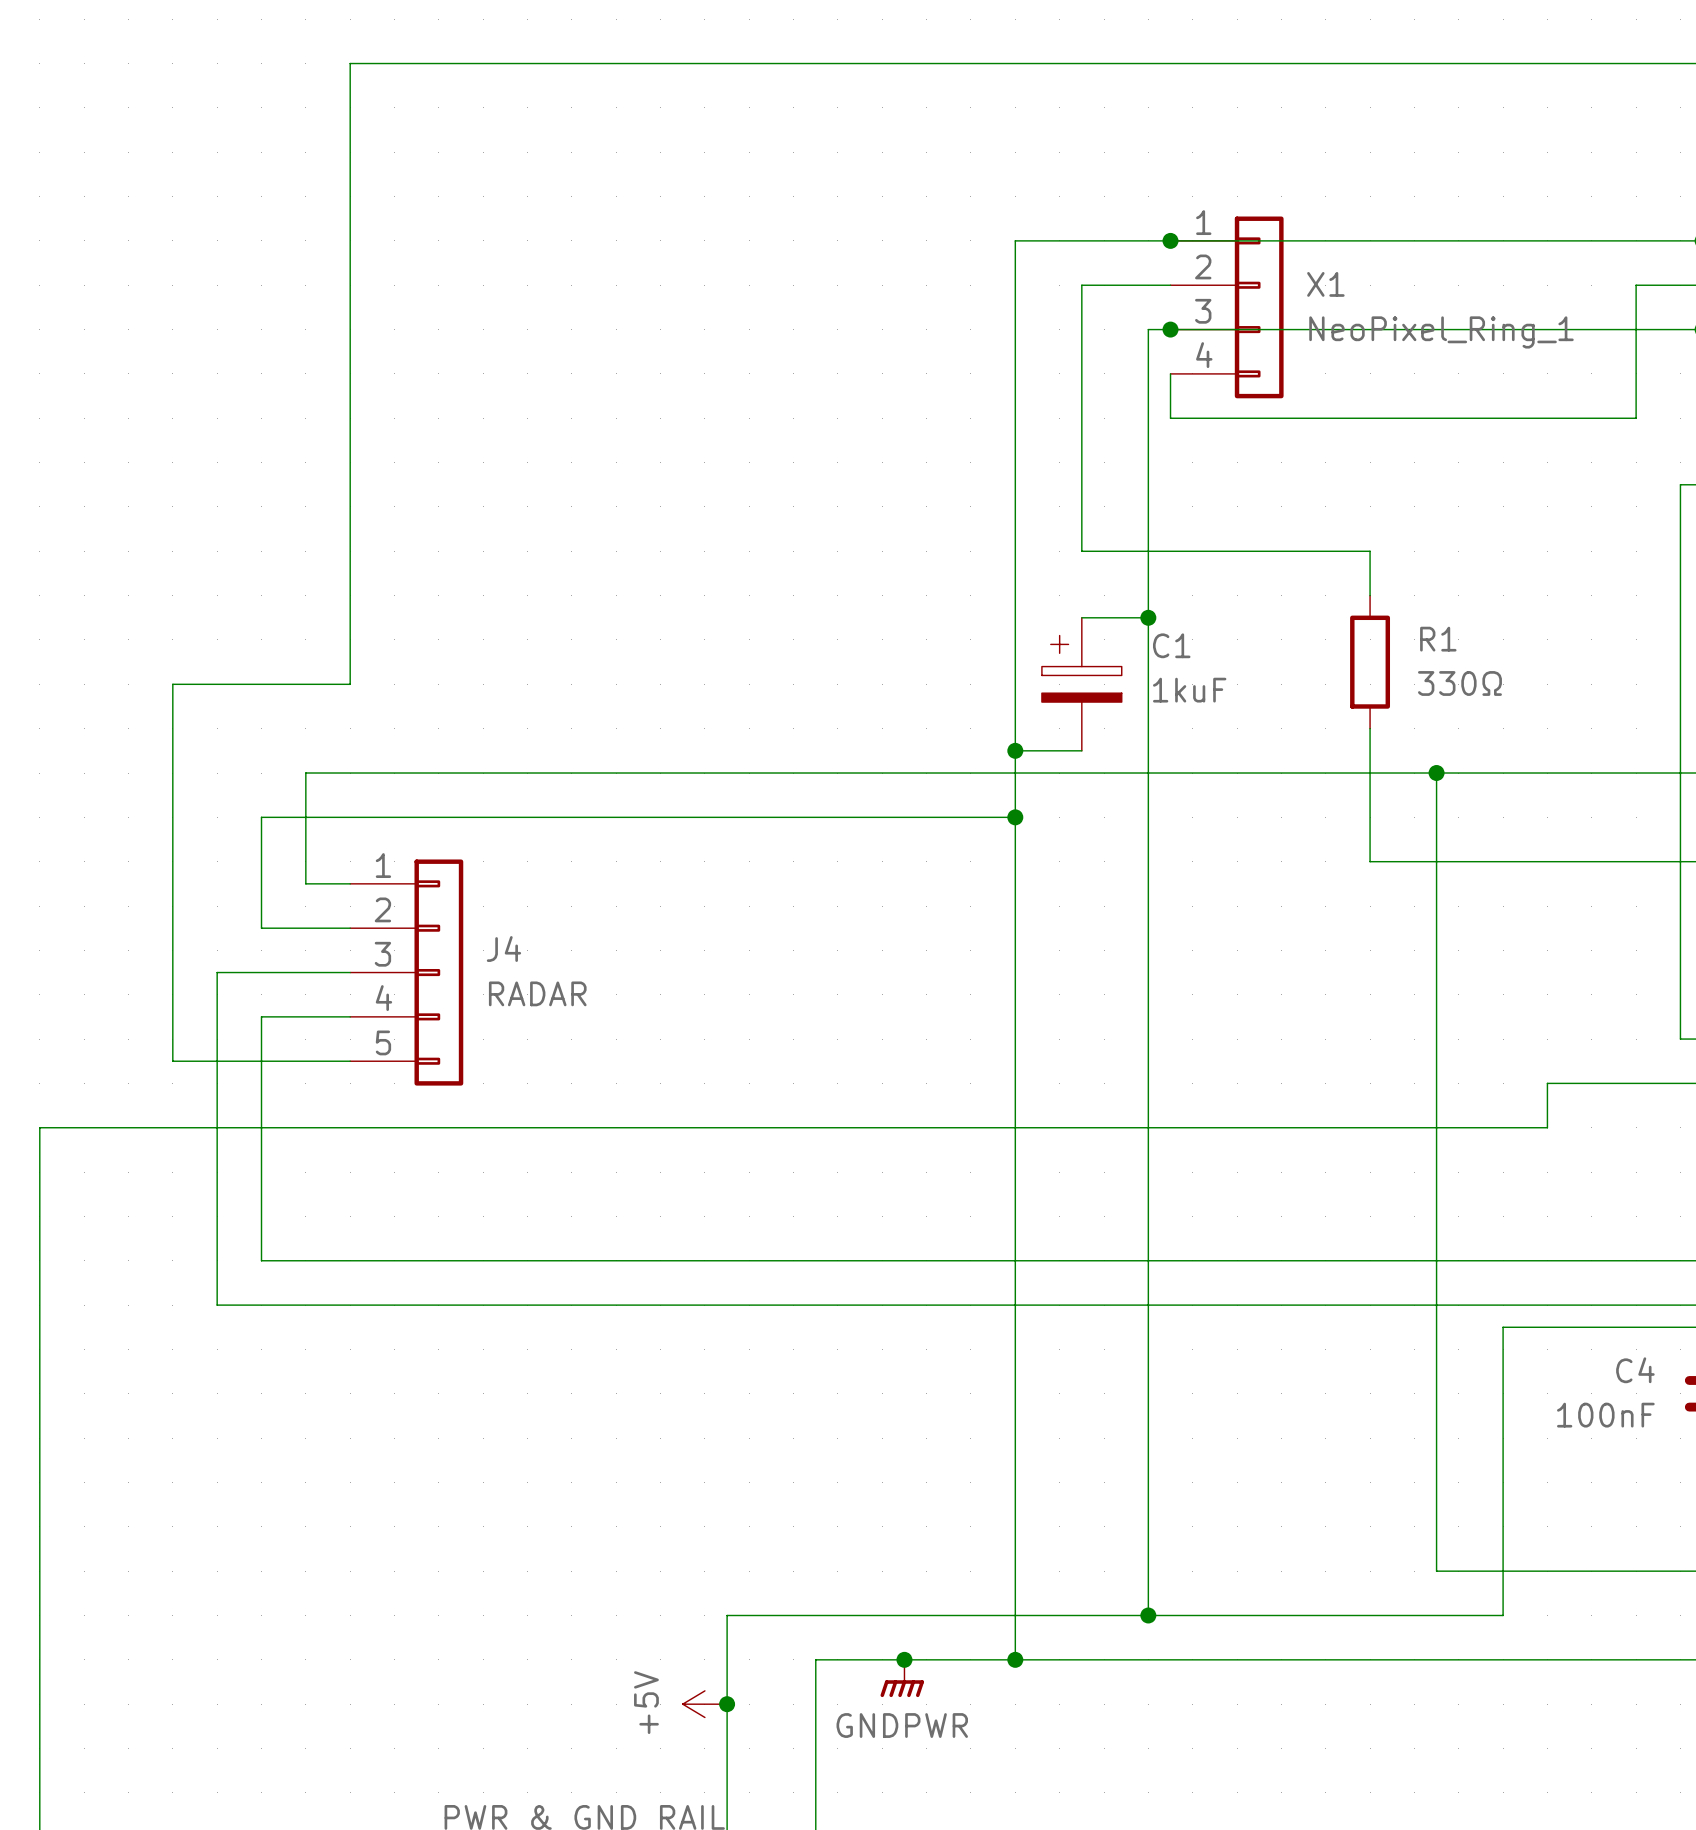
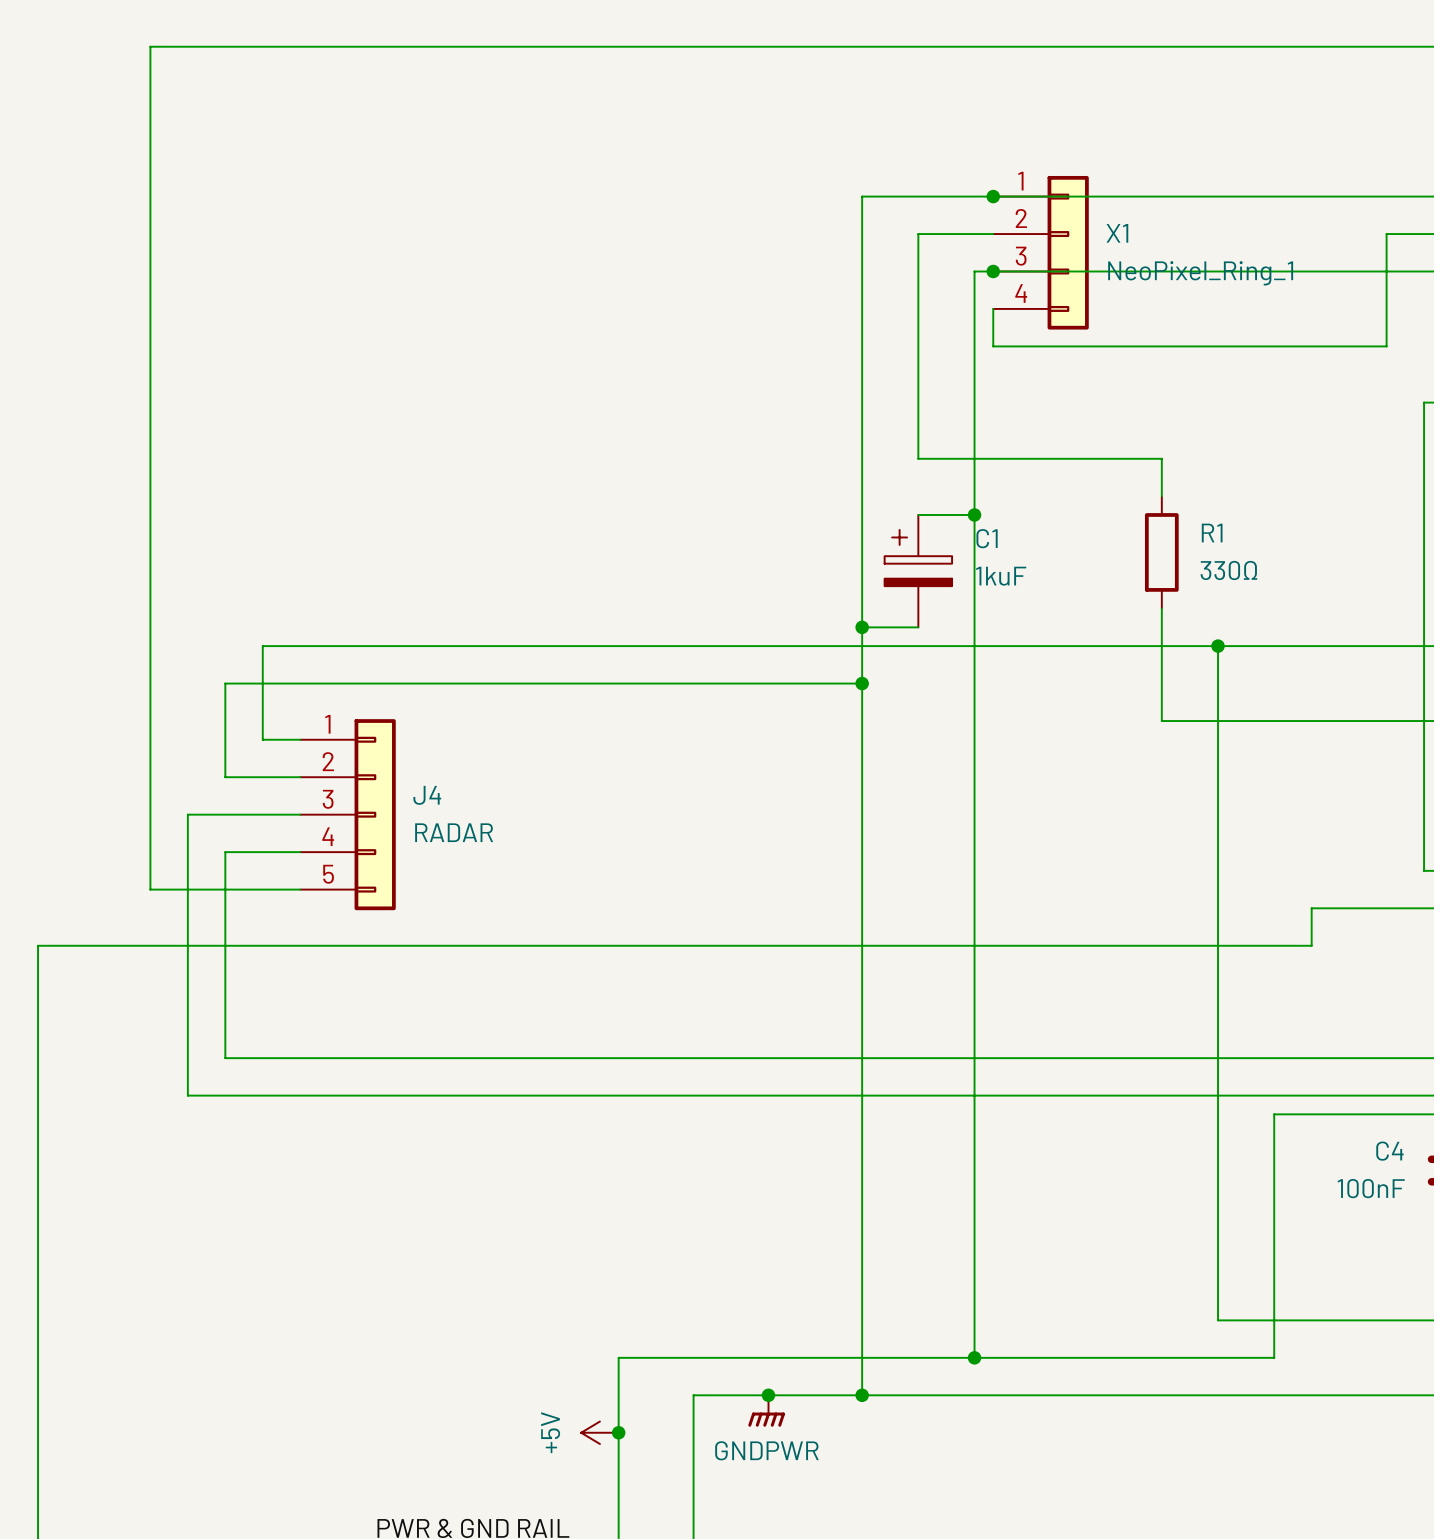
wire: (350, 63) (350, 684) (172, 684) -> (300, 46) (150, 46) (150, 571)

